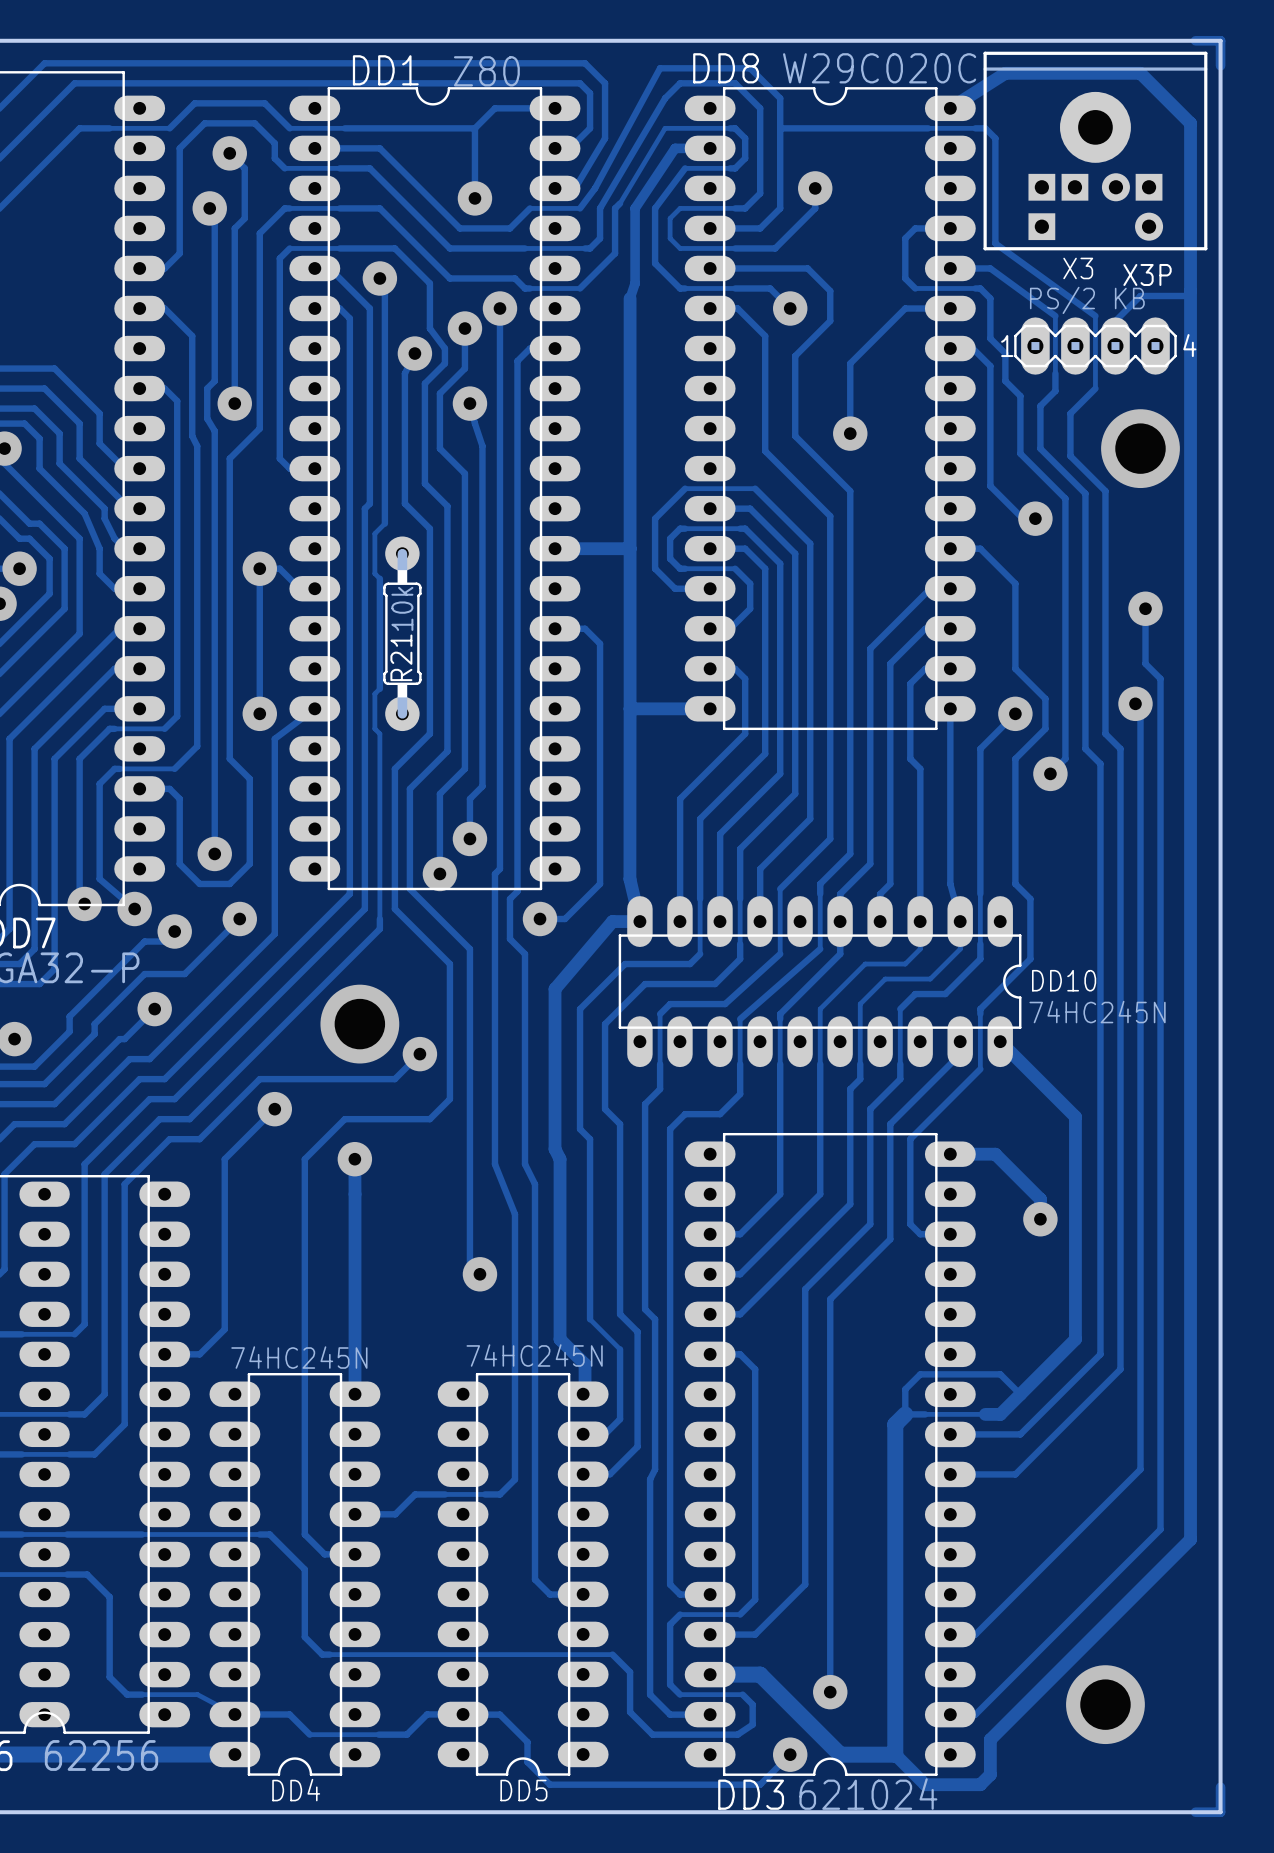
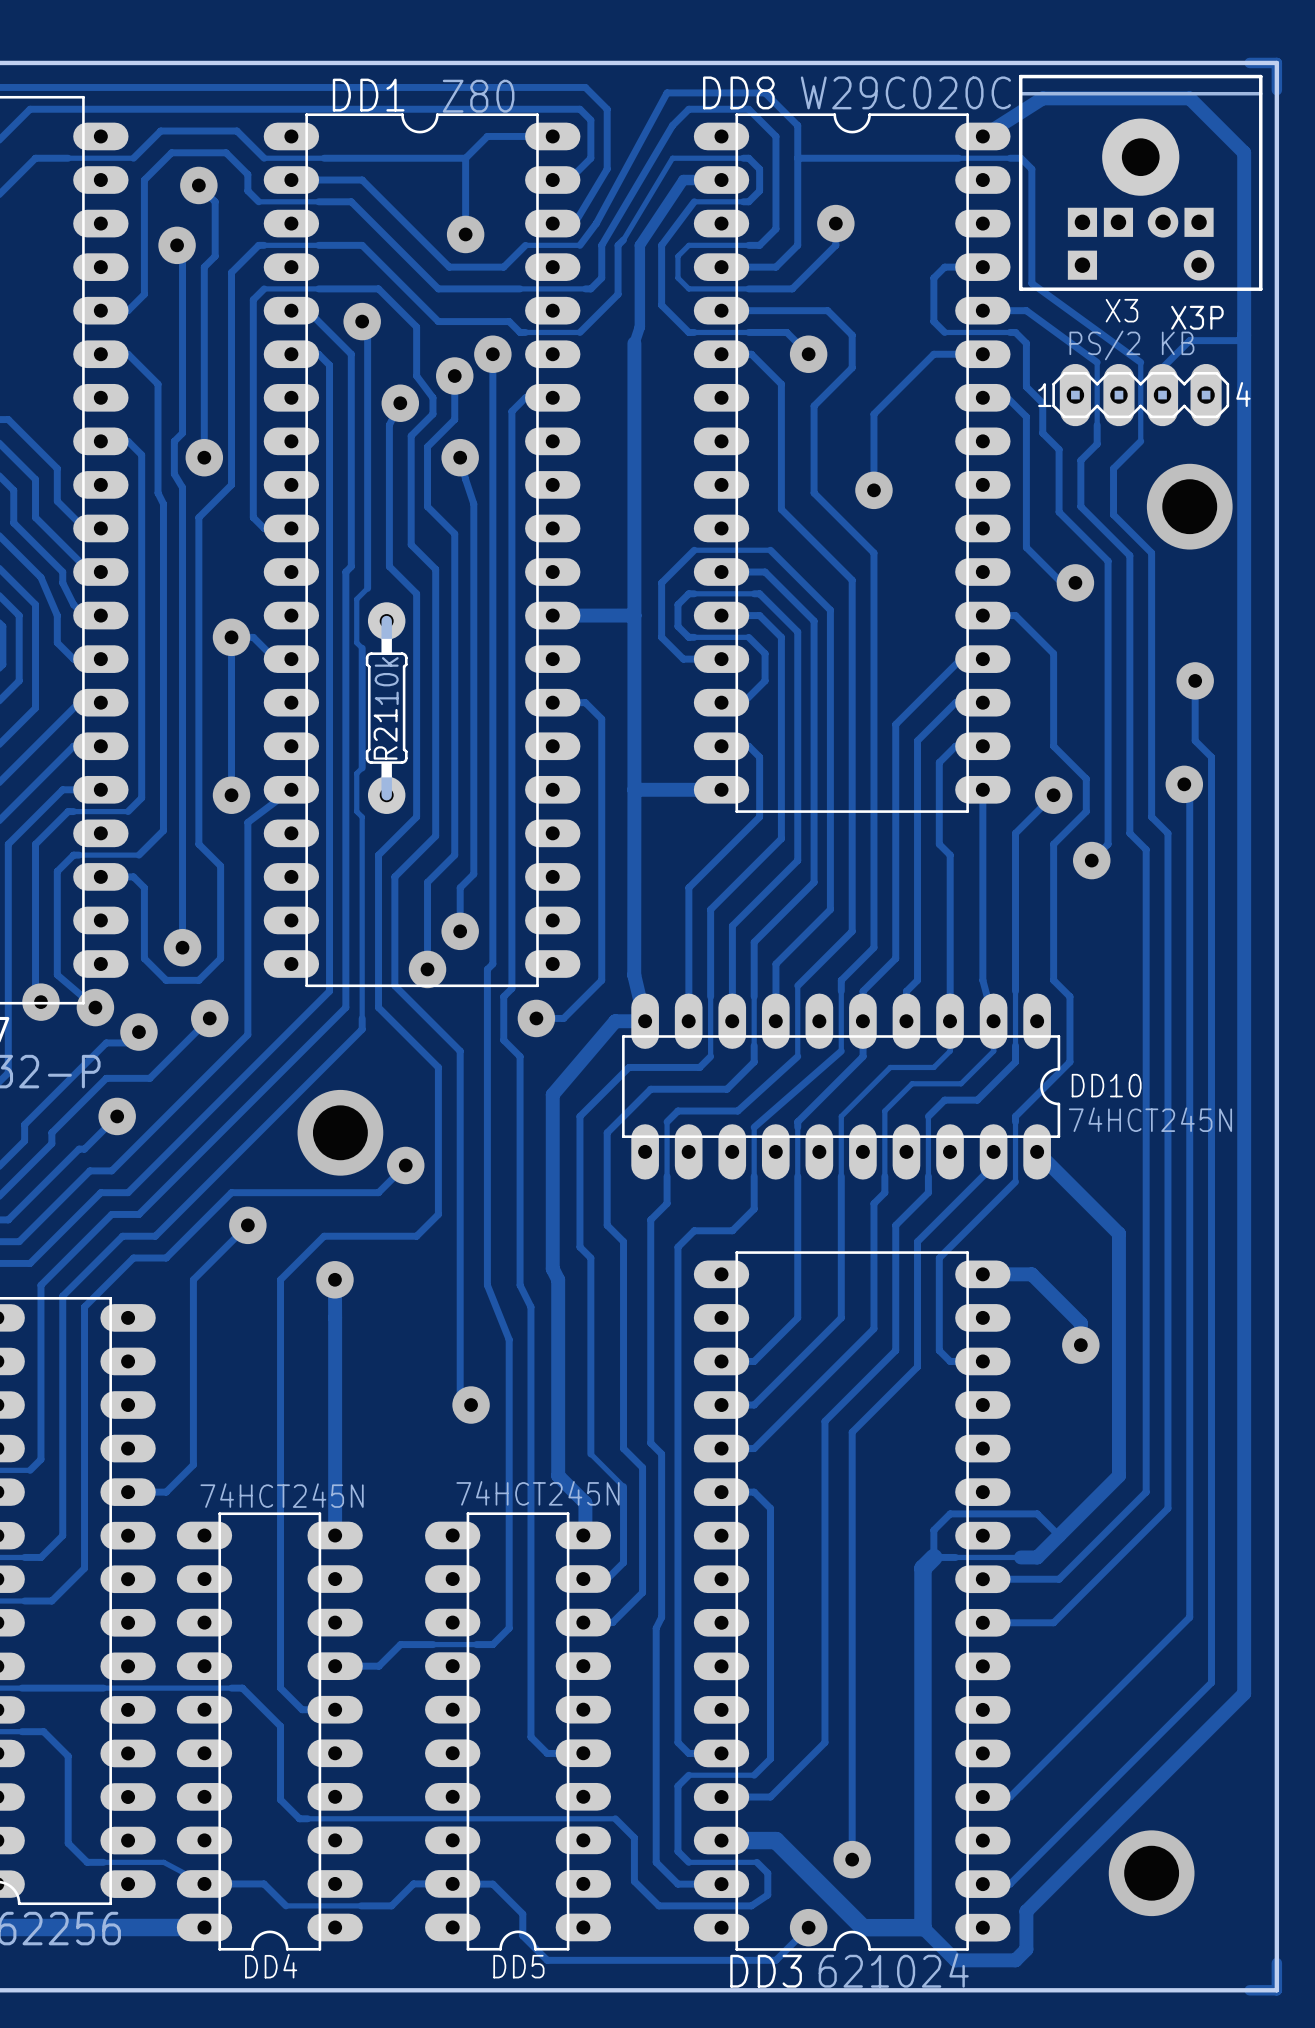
DD10 value: 74HC245N (1097, 1012) -> 74HCT245N (1150, 1119)
DD5 value: 74HC245N (534, 1355) -> 74HCT245N (538, 1493)
DD4 value: 74HC245N (299, 1357) -> 74HCT245N (282, 1495)

